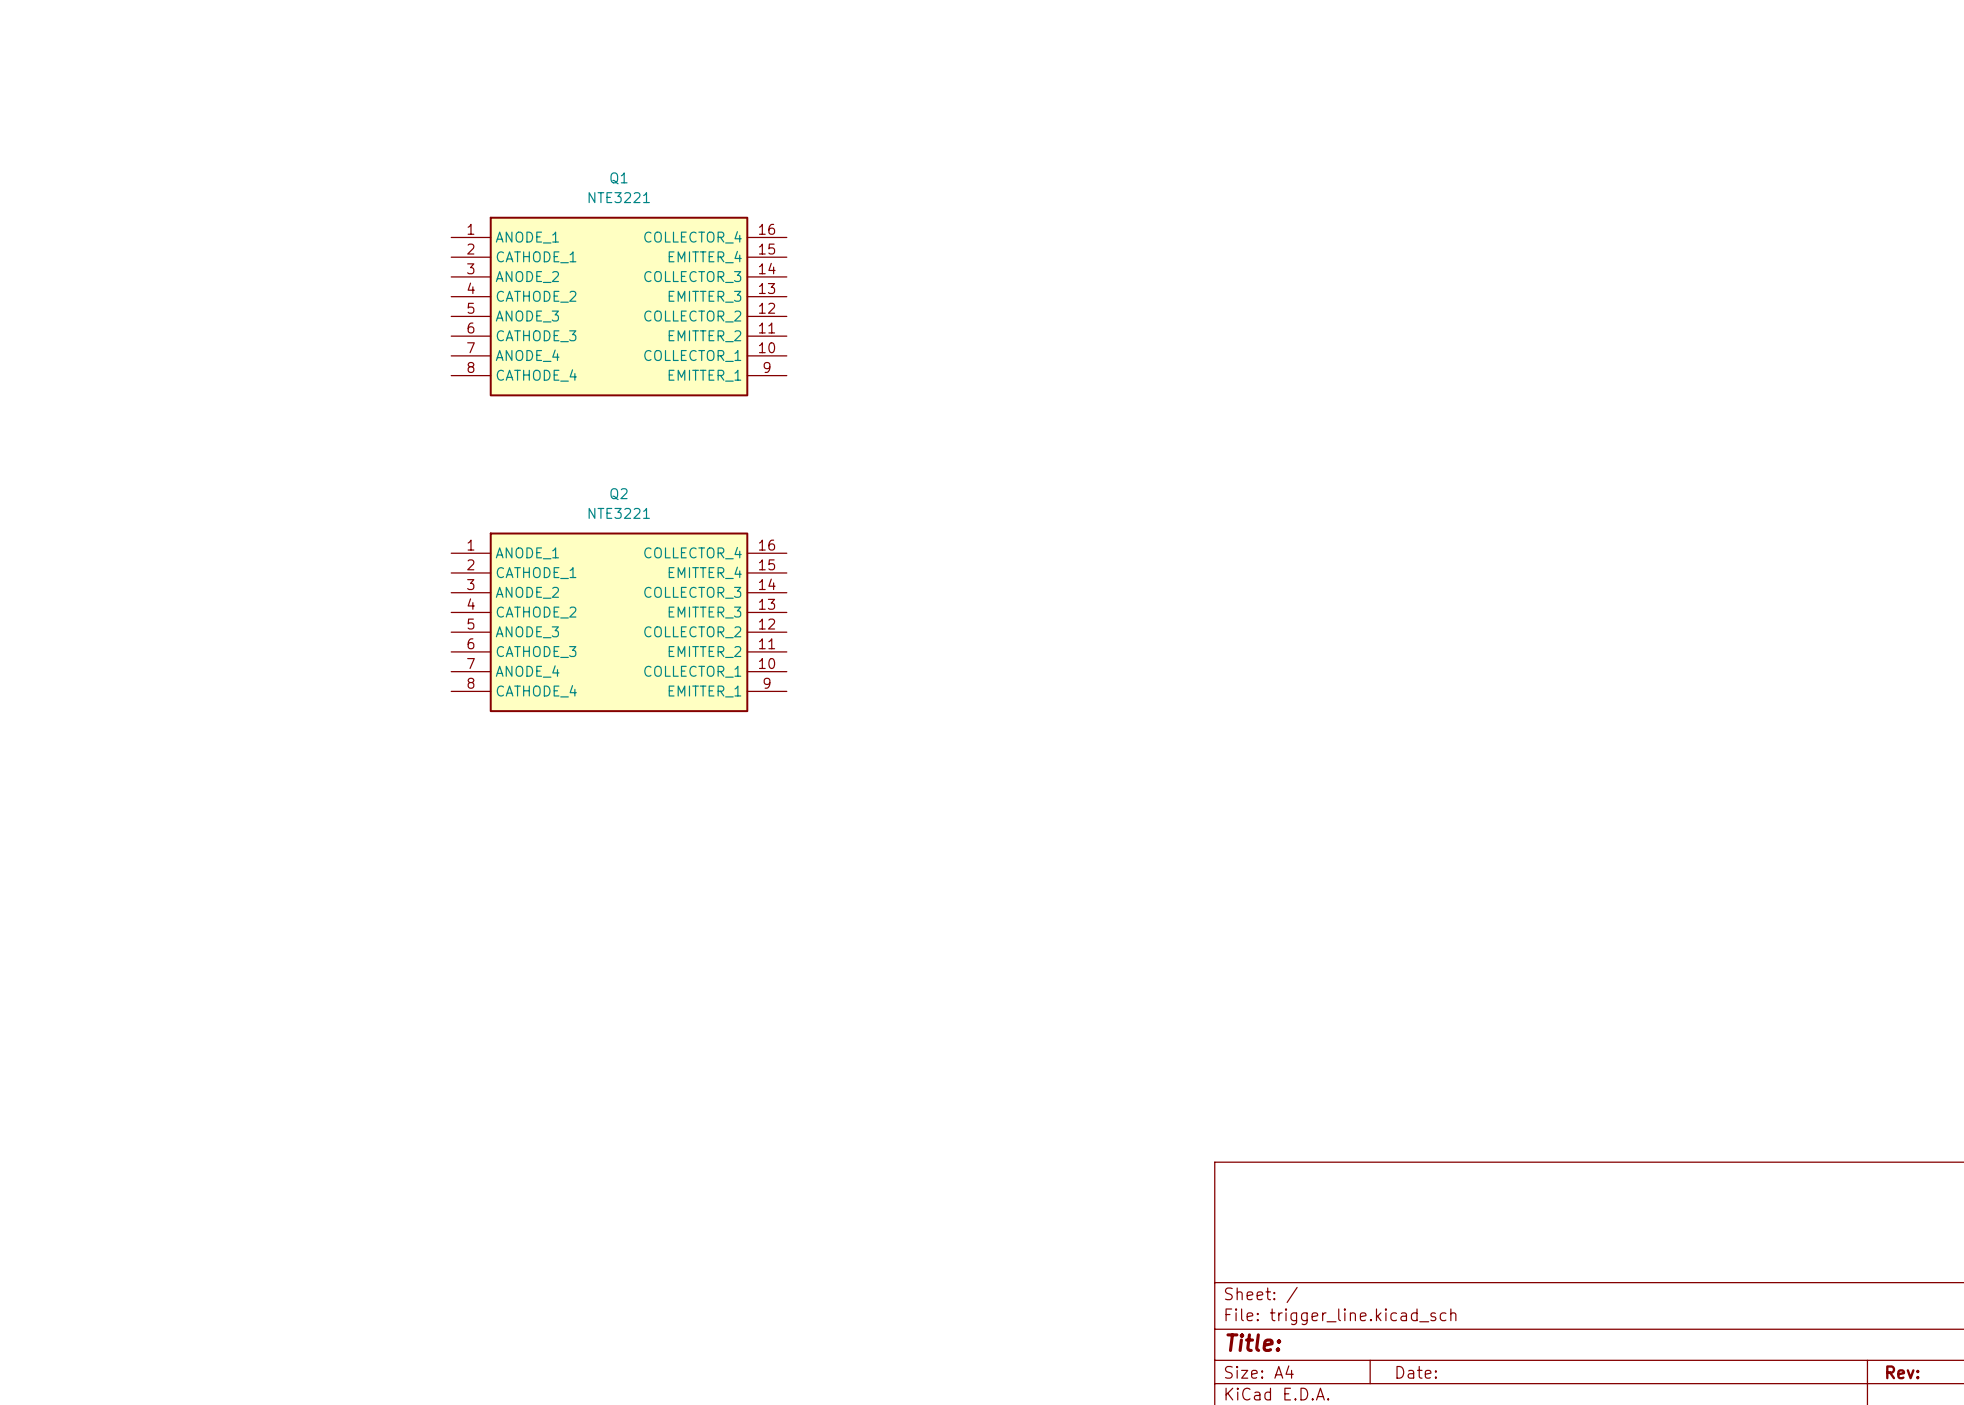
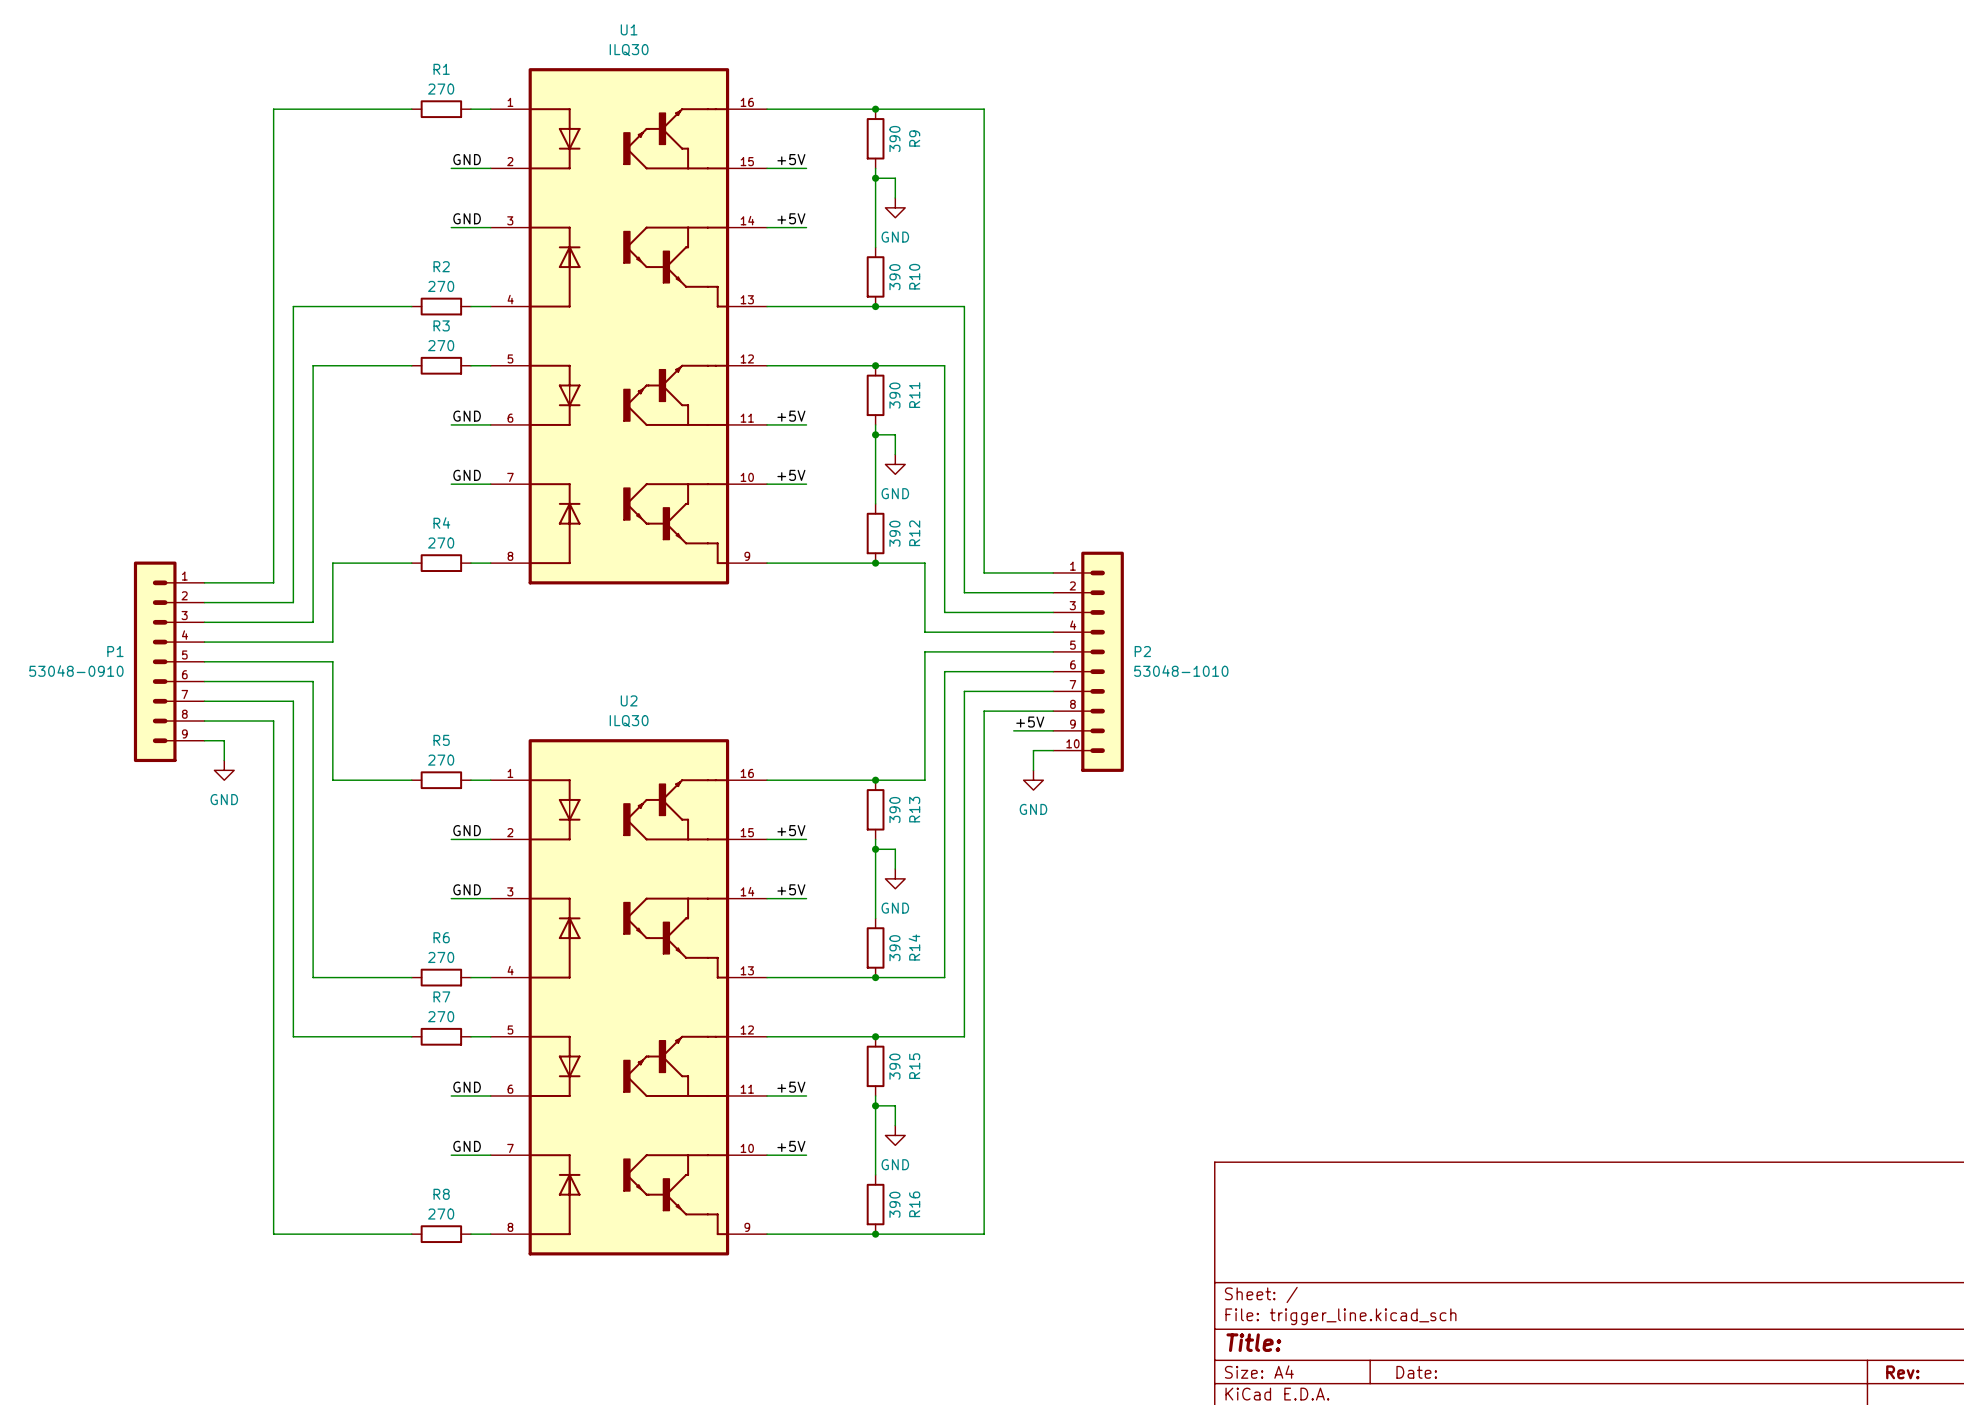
wire: none -> (411, 109) (273, 109) (273, 582) (204, 582)
R1: none -> 270 (441, 109)
wire: none -> (470, 109) (490, 109)
wire: none -> (767, 109) (984, 109) (984, 572) (1053, 572)
junction: none -> (875, 109)
R9: none -> 390 (875, 138)
label: none -> GND (467, 159)
label: none -> +5V (791, 159)
wire: none -> (451, 168) (490, 168)
wire: none -> (767, 168) (806, 168)
wire: none -> (875, 168) (875, 247)
wire: none -> (875, 178) (895, 178) (895, 197)
junction: none -> (875, 178)
power symbol: none -> GND (895, 207)
label: none -> GND (467, 218)
label: none -> +5V (791, 218)
wire: none -> (451, 227) (490, 227)
wire: none -> (767, 227) (806, 227)
R10: none -> 390 (875, 276)
wire: none -> (411, 306) (293, 306) (293, 602) (204, 602)
R2: none -> 270 (441, 306)
wire: none -> (470, 306) (490, 306)
Q1: NTE3221 (619, 306) -> none
wire: none -> (767, 306) (964, 306) (964, 592) (1053, 592)
junction: none -> (875, 306)
U1: none -> ILQ30 (628, 326)
wire: none -> (411, 365) (313, 365) (313, 622) (204, 622)
R3: none -> 270 (441, 365)
wire: none -> (470, 365) (490, 365)
wire: none -> (767, 365) (944, 365) (944, 612) (1053, 612)
junction: none -> (875, 365)
R11: none -> 390 (875, 395)
label: none -> GND (467, 416)
label: none -> +5V (791, 416)
wire: none -> (451, 424) (490, 424)
wire: none -> (767, 424) (806, 424)
wire: none -> (875, 424) (875, 503)
wire: none -> (875, 434) (895, 434) (895, 454)
junction: none -> (875, 434)
power symbol: none -> GND (895, 464)
label: none -> GND (467, 475)
label: none -> +5V (791, 475)
wire: none -> (451, 484) (490, 484)
wire: none -> (767, 484) (806, 484)
R12: none -> 390 (875, 533)
wire: none -> (411, 563) (332, 563) (332, 642) (204, 642)
R4: none -> 270 (441, 563)
wire: none -> (470, 563) (490, 563)
wire: none -> (767, 563) (924, 563) (924, 632) (1053, 632)
junction: none -> (875, 563)
Q2: NTE3221 (619, 622) -> none
wire: none -> (1053, 651) (924, 651) (924, 780) (767, 780)
P1: none -> 53048-0910 (169, 661)
wire: none -> (204, 661) (332, 661) (332, 780) (411, 780)
P2: none -> 53048-1010 (1088, 661)
wire: none -> (1053, 671) (944, 671) (944, 977) (767, 977)
wire: none -> (204, 681) (313, 681) (313, 977) (411, 977)
wire: none -> (1053, 691) (964, 691) (964, 1036) (767, 1036)
wire: none -> (204, 701) (293, 701) (293, 1036) (411, 1036)
wire: none -> (1053, 711) (984, 711) (984, 1234) (767, 1234)
wire: none -> (204, 721) (273, 721) (273, 1234) (411, 1234)
label: none -> +5V (1030, 722)
wire: none -> (1013, 730) (1053, 730)
wire: none -> (204, 740) (224, 740) (224, 760)
wire: none -> (1053, 750) (1033, 750) (1033, 770)
power symbol: none -> GND (224, 770)
R5: none -> 270 (441, 780)
wire: none -> (470, 780) (490, 780)
junction: none -> (875, 780)
power symbol: none -> GND (1033, 780)
R13: none -> 390 (875, 809)
label: none -> GND (467, 830)
label: none -> +5V (791, 830)
wire: none -> (451, 839) (490, 839)
wire: none -> (767, 839) (806, 839)
wire: none -> (875, 839) (875, 918)
wire: none -> (875, 849) (895, 849) (895, 869)
junction: none -> (875, 849)
power symbol: none -> GND (895, 878)
label: none -> GND (467, 889)
label: none -> +5V (791, 889)
wire: none -> (451, 898) (490, 898)
wire: none -> (767, 898) (806, 898)
R14: none -> 390 (875, 947)
R6: none -> 270 (441, 977)
wire: none -> (470, 977) (490, 977)
junction: none -> (875, 977)
U2: none -> ILQ30 (628, 997)
R7: none -> 270 (441, 1036)
wire: none -> (470, 1036) (490, 1036)
junction: none -> (875, 1036)
R15: none -> 390 (875, 1066)
label: none -> GND (467, 1087)
label: none -> +5V (791, 1087)
wire: none -> (451, 1095) (490, 1095)
wire: none -> (767, 1095) (806, 1095)
wire: none -> (875, 1095) (875, 1174)
wire: none -> (875, 1105) (895, 1105) (895, 1125)
junction: none -> (875, 1105)
power symbol: none -> GND (895, 1135)
label: none -> GND (467, 1146)
label: none -> +5V (791, 1146)
wire: none -> (451, 1155) (490, 1155)
wire: none -> (767, 1155) (806, 1155)
R16: none -> 390 (875, 1204)
R8: none -> 270 (441, 1234)
wire: none -> (470, 1234) (490, 1234)
junction: none -> (875, 1234)

